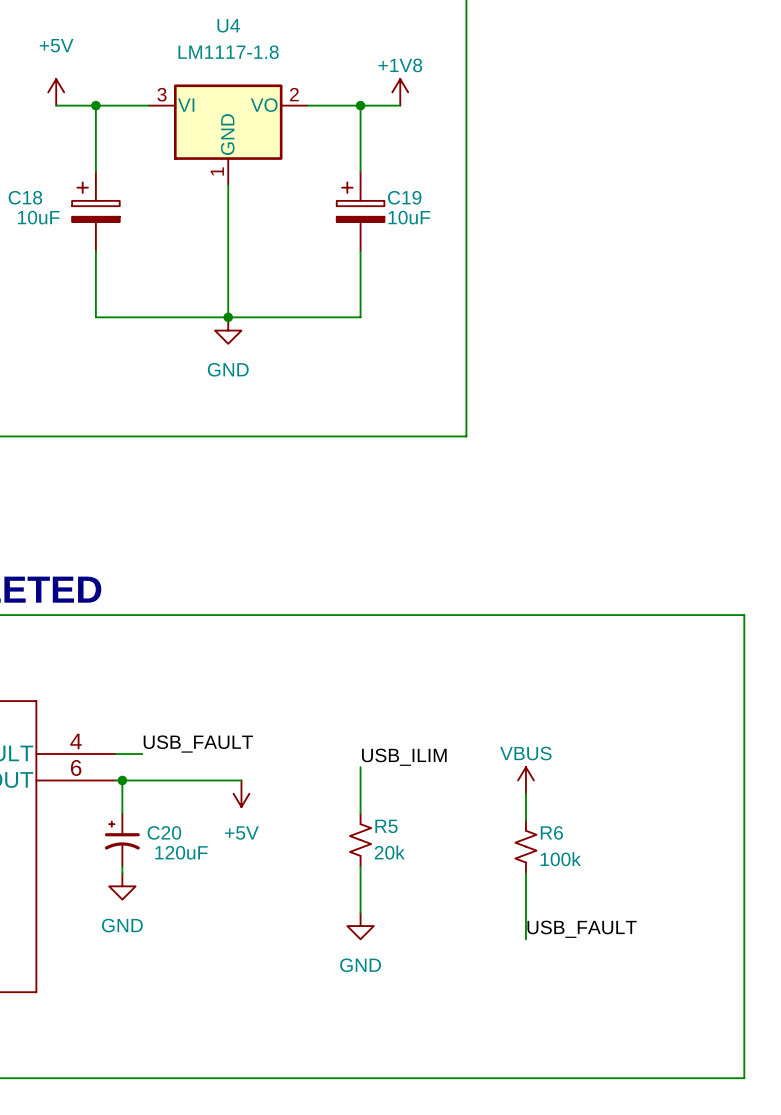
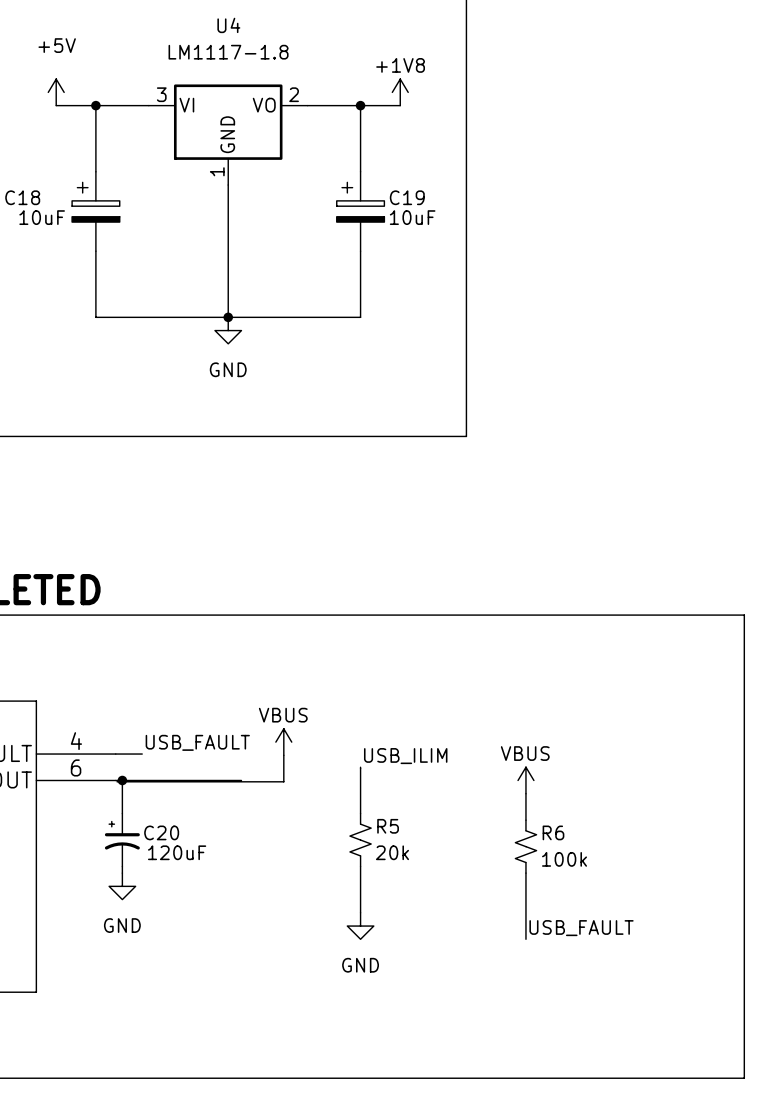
power symbol: none -> VBUS (283, 742)
wire: none -> (283, 755) (283, 781) (117, 781)
power symbol: +5V (241, 793) -> none

